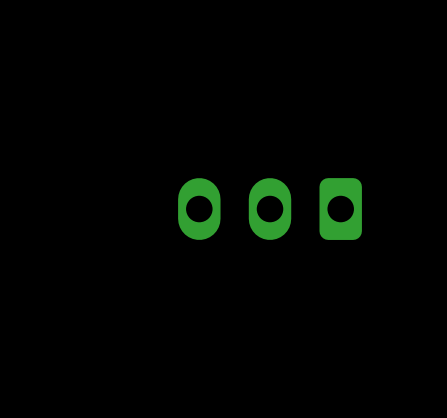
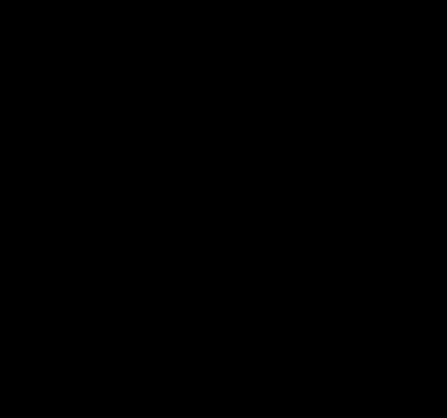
part: (270, 209) -> none

